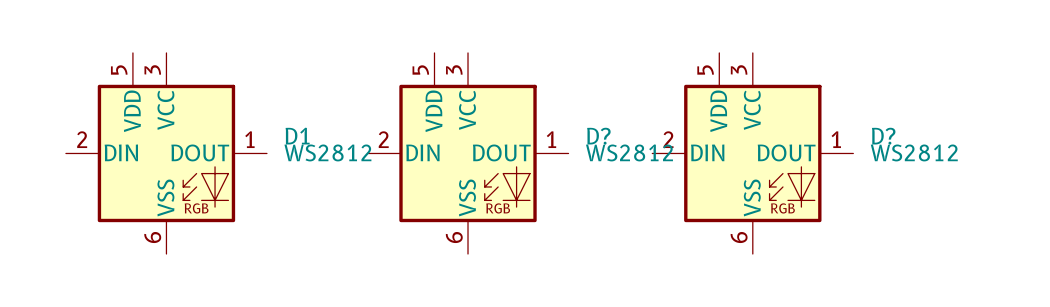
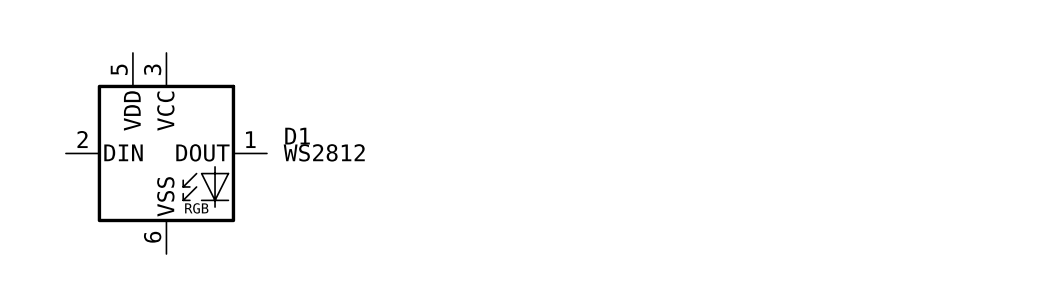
D?: WS2812 (468, 153) -> none
D?: WS2812 (752, 153) -> none

